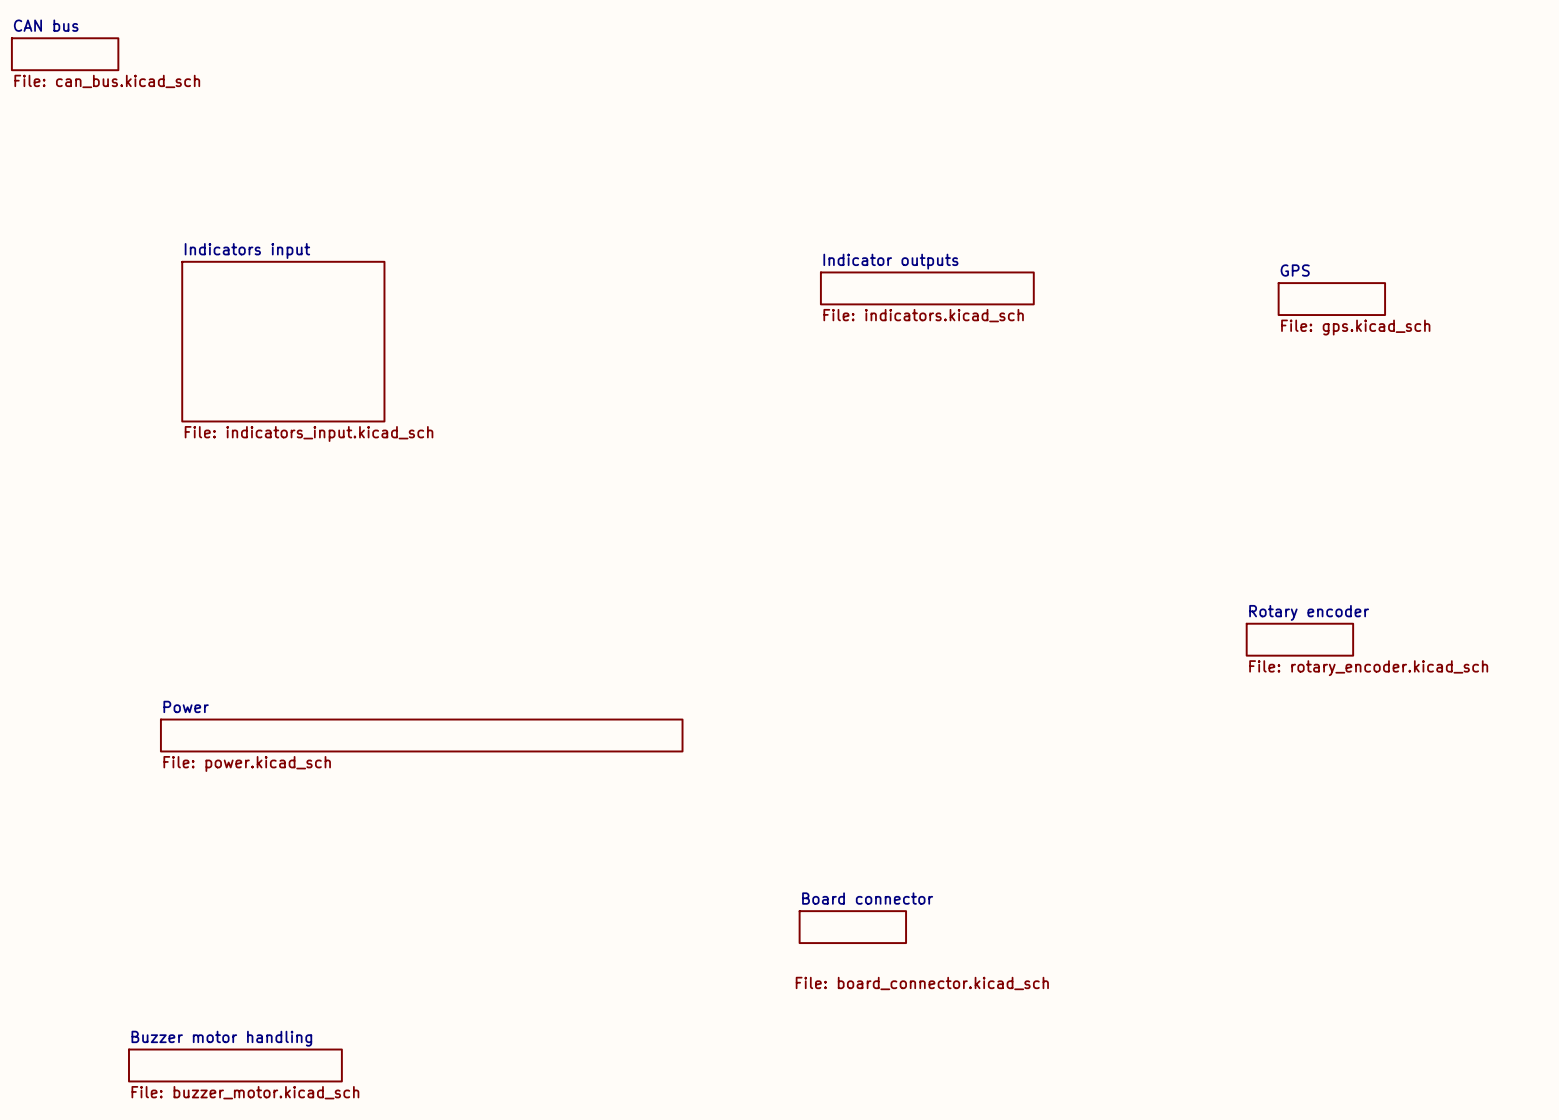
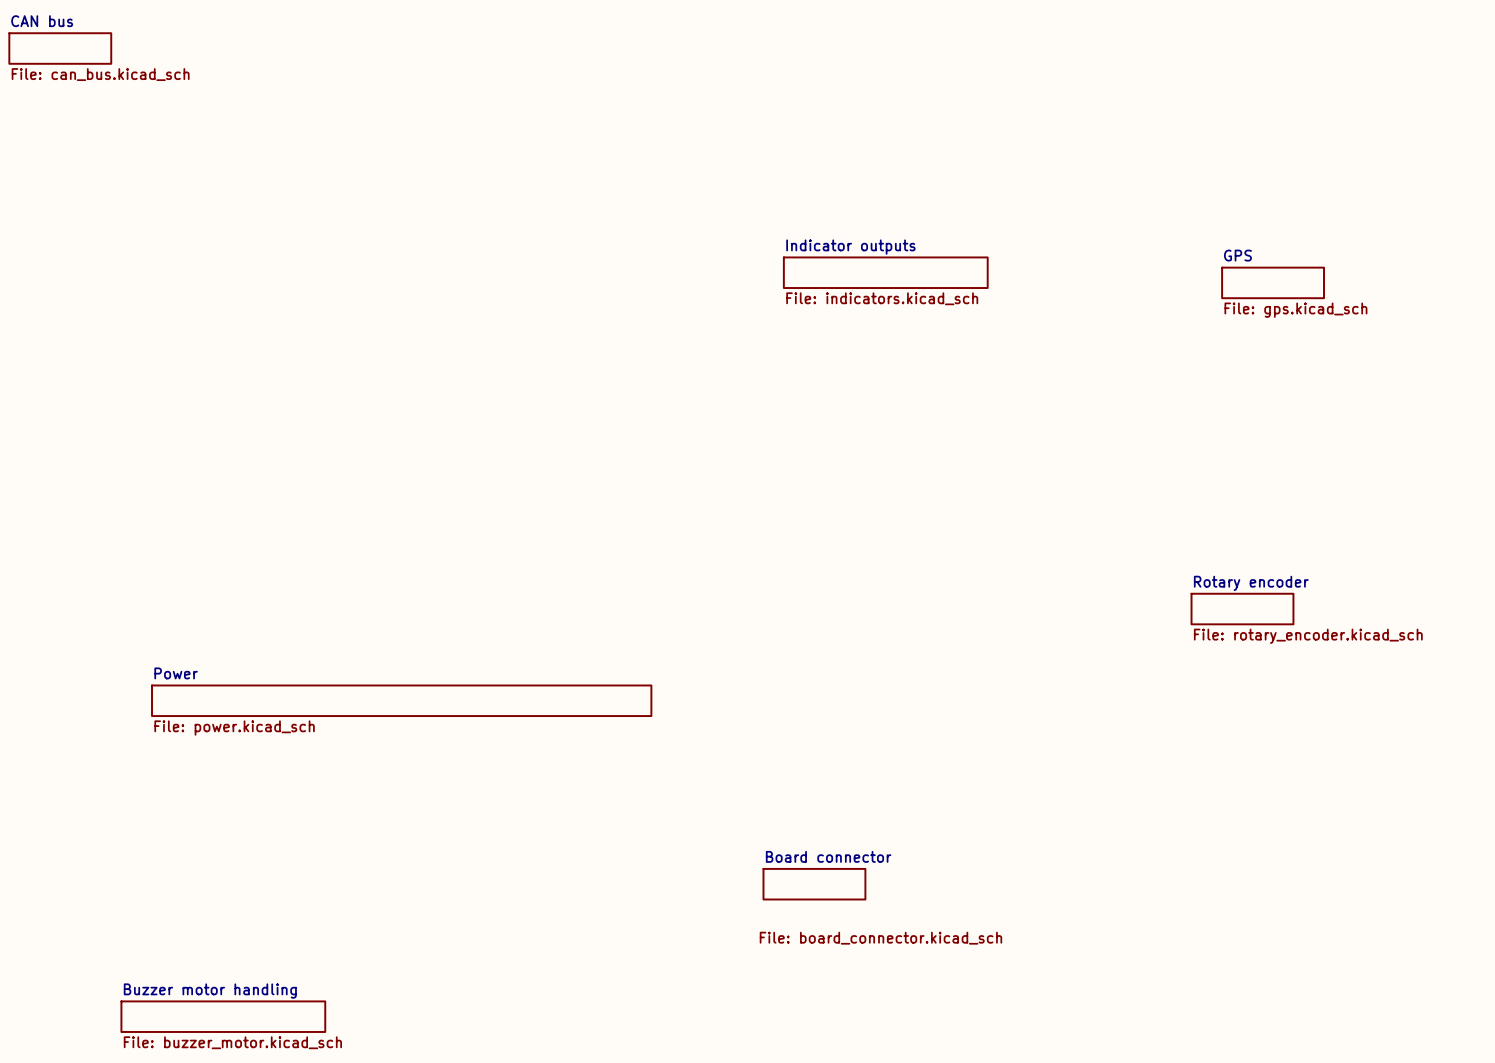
sheet Indicators input: File: indicators_input.kicad_sch (283, 341) -> none

